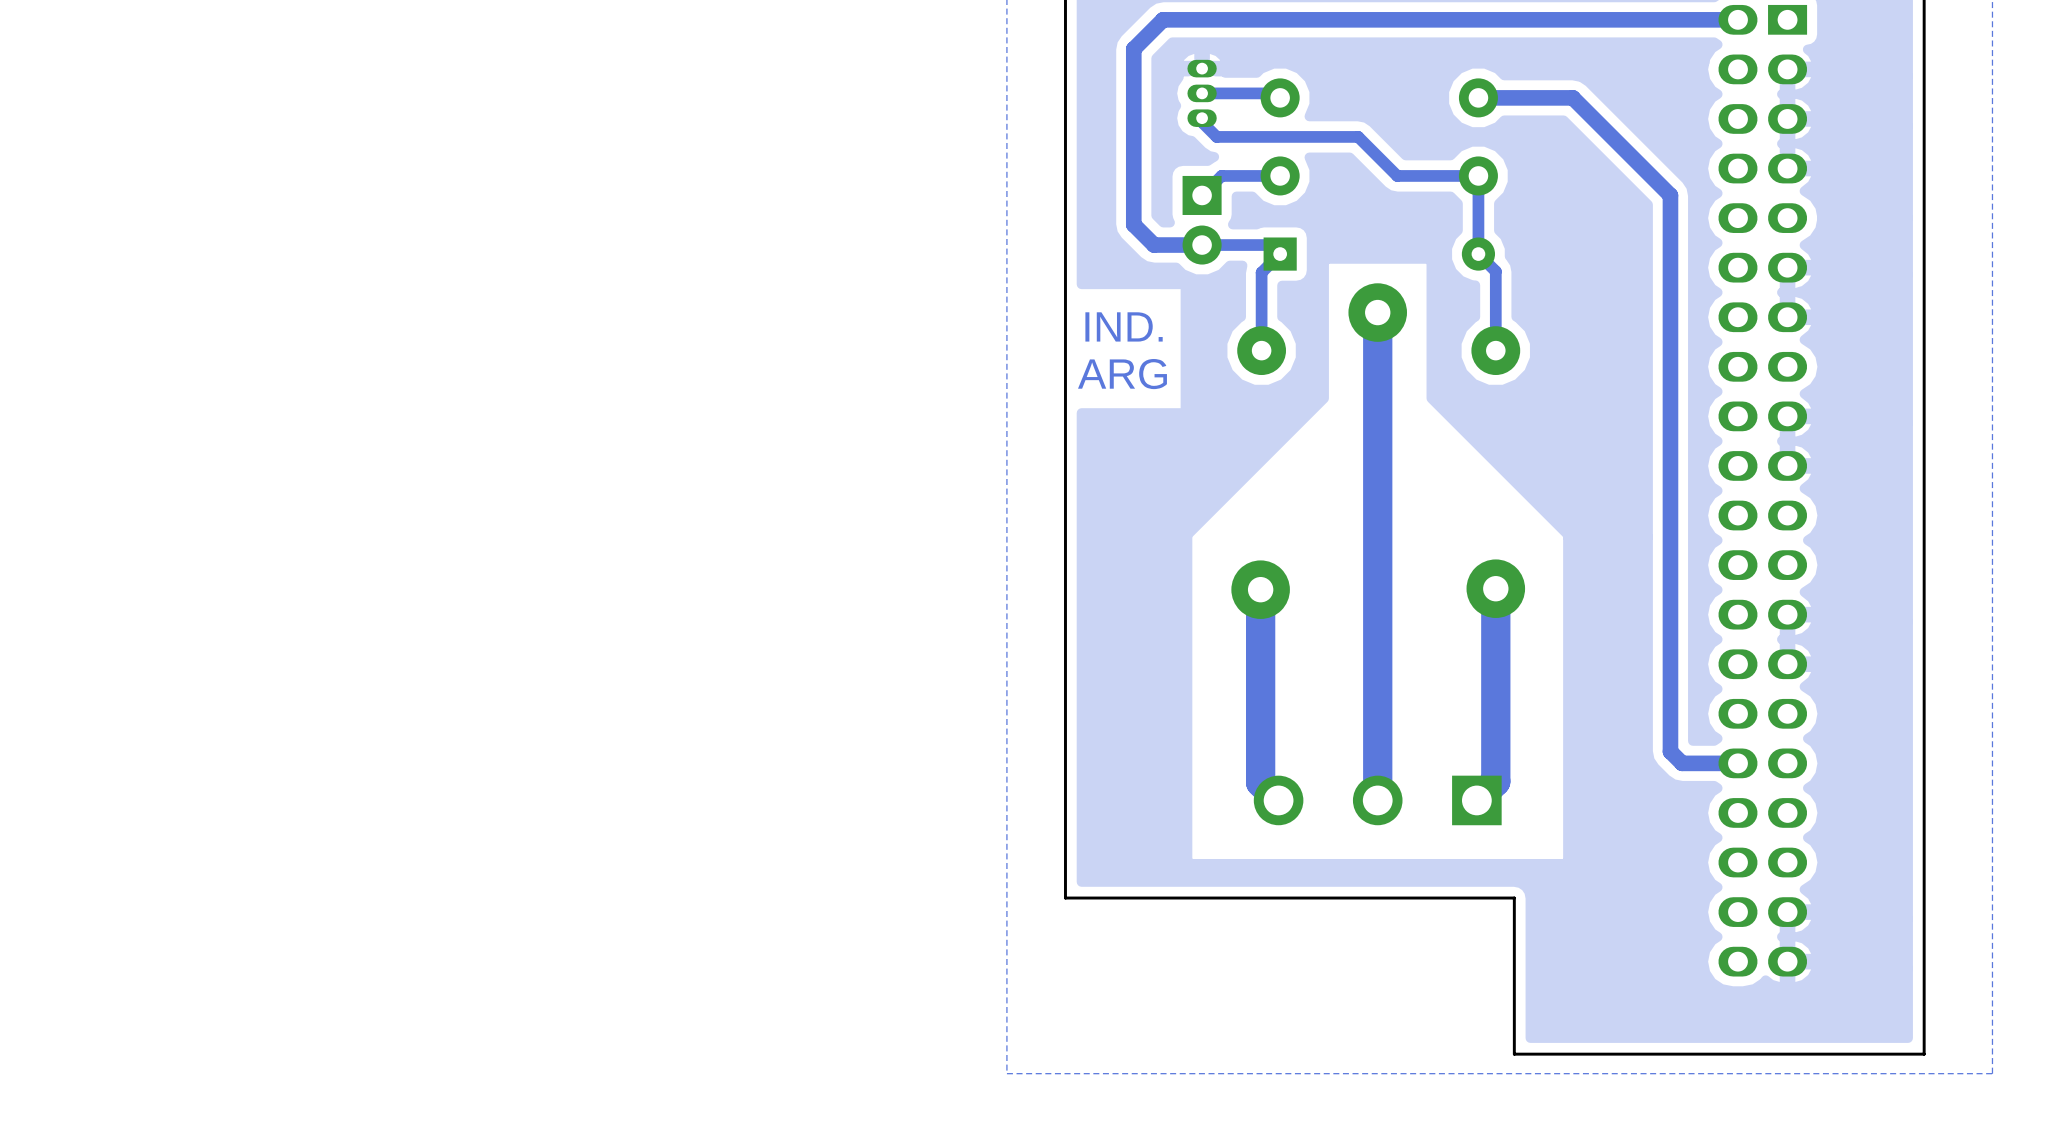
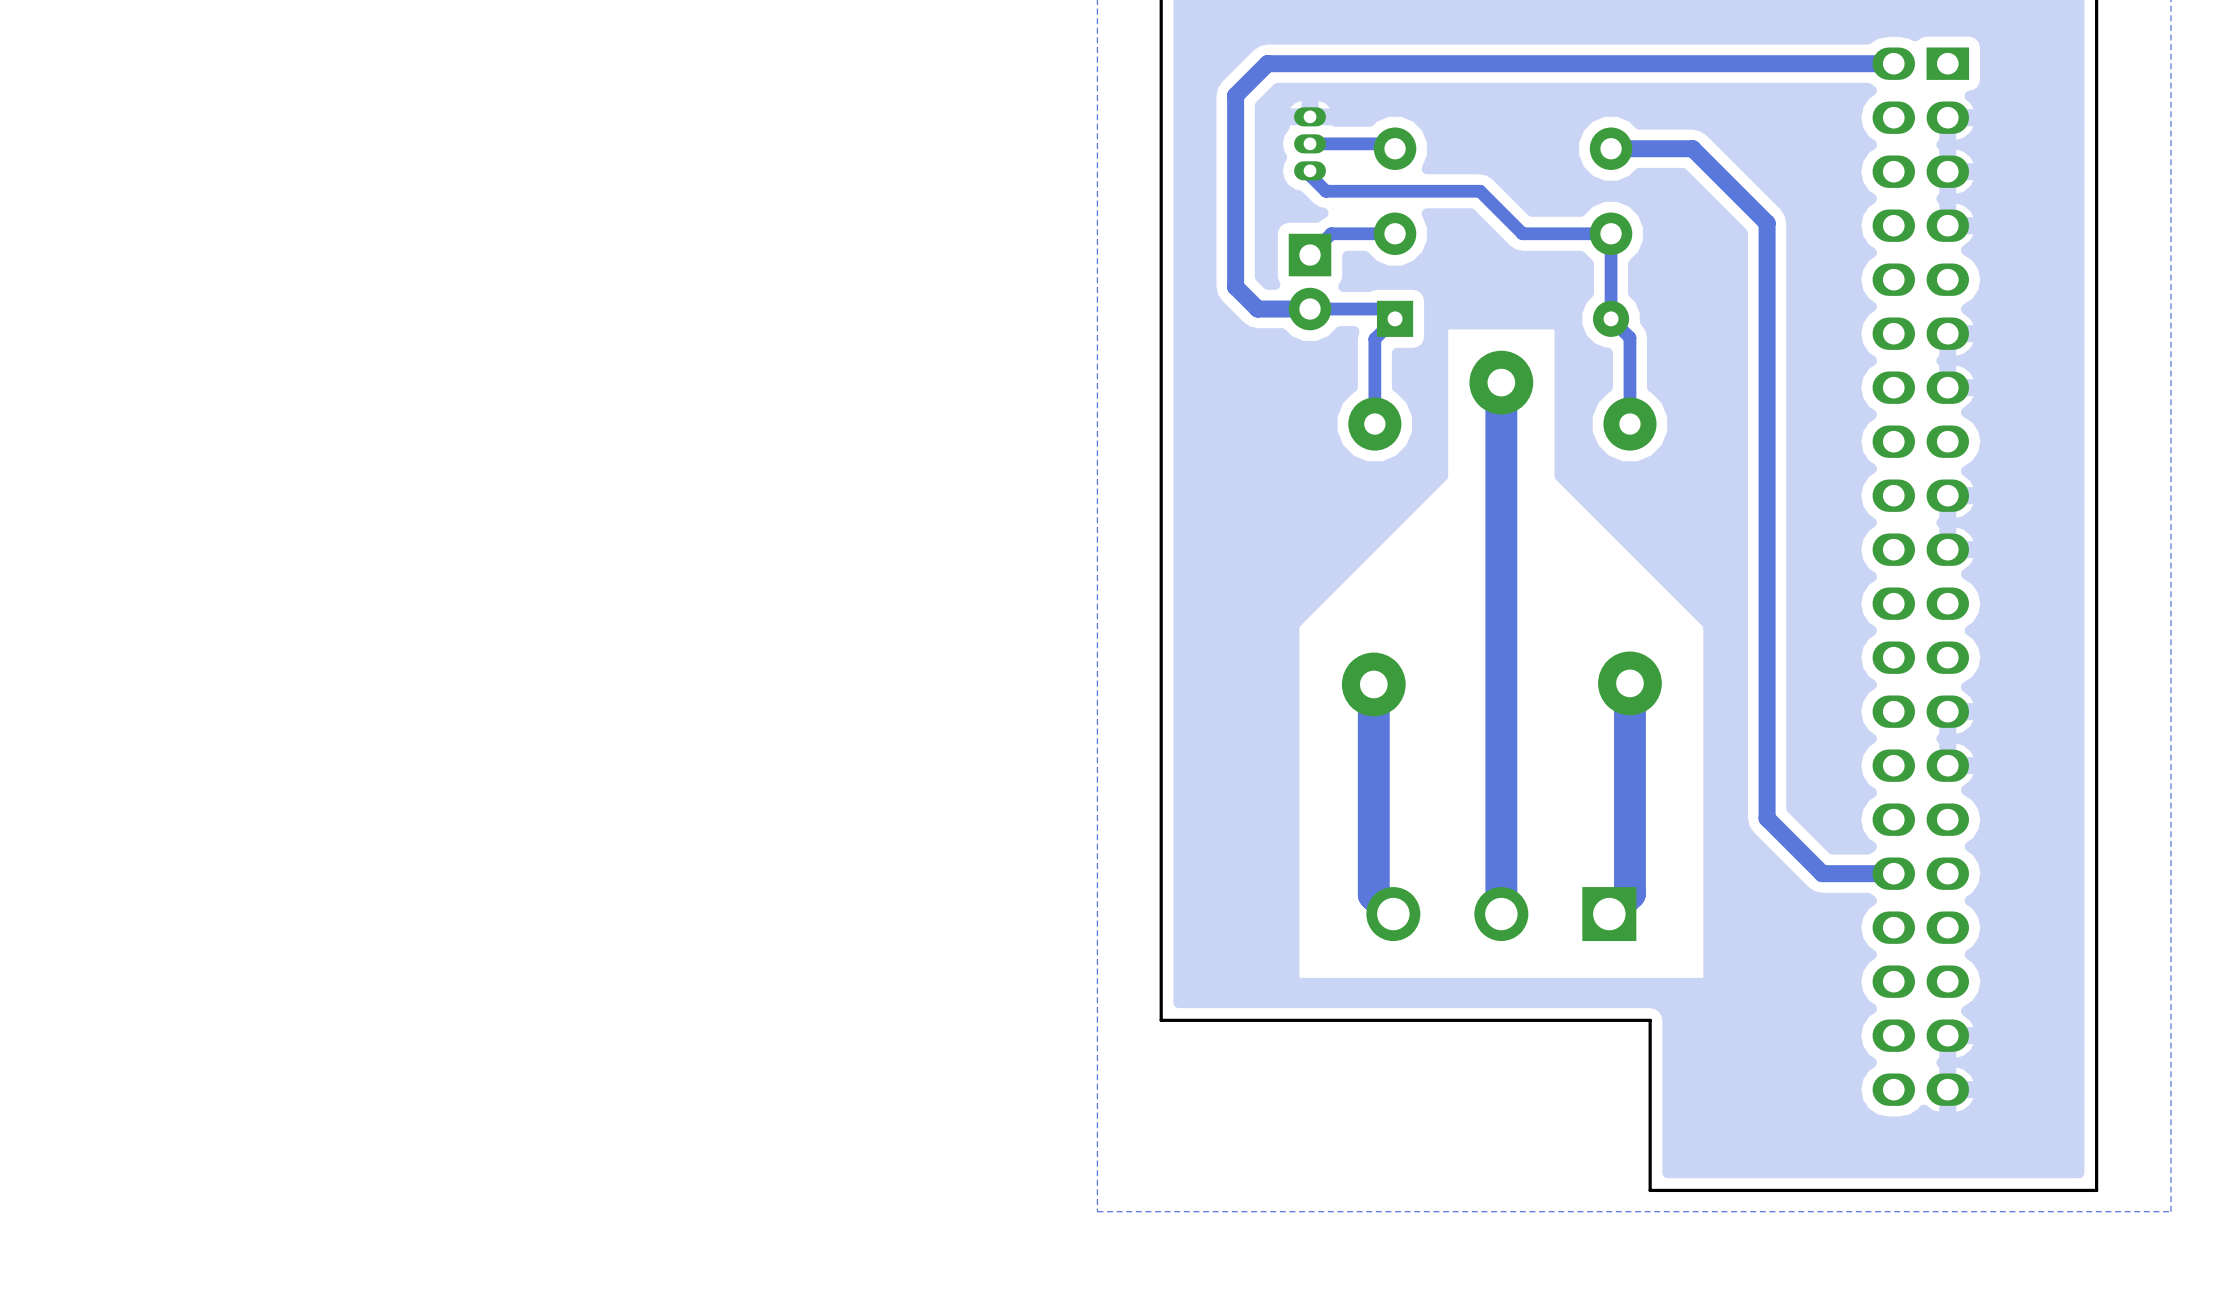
track: (1553, 97) (1572, 97) (1670, 195) (1670, 751) (1682, 763) -> (1692, 148) (1767, 223) (1767, 818) (1822, 873) (1832, 873)
text: IND. (1124, 326) -> none
text: ARG (1122, 374) -> none

